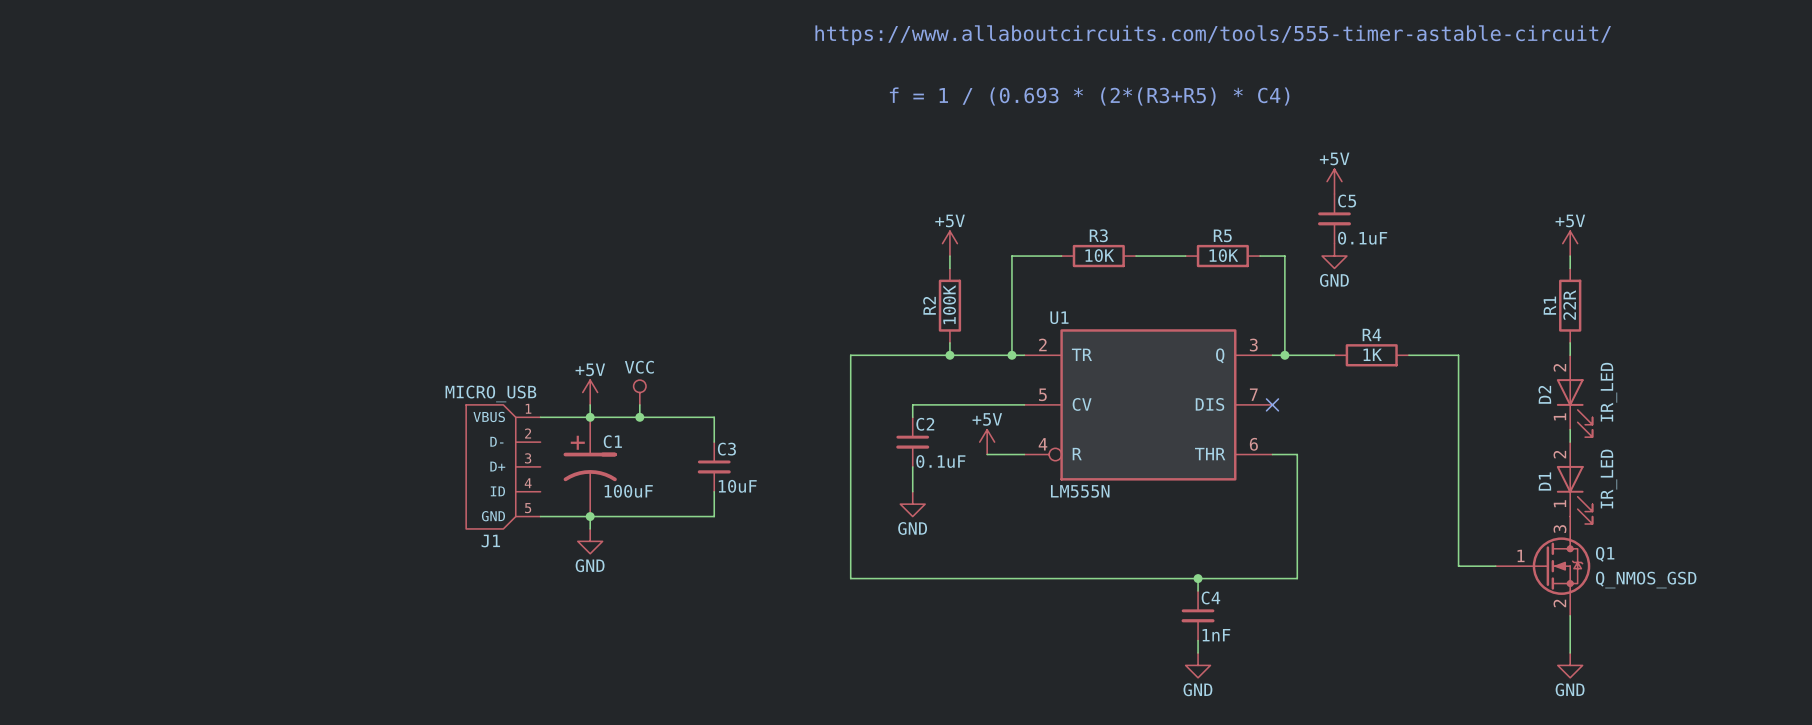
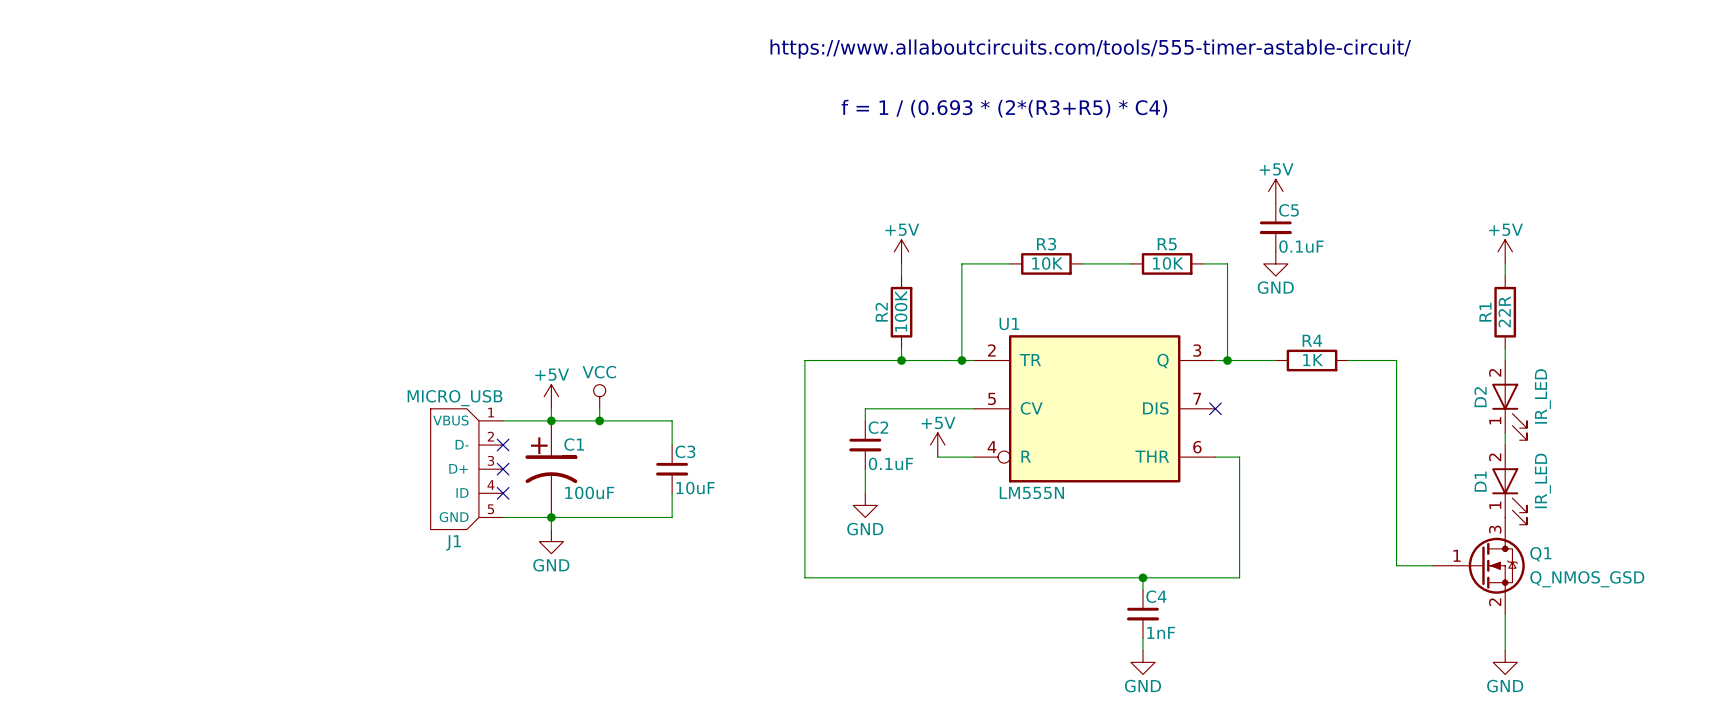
no-connect mark: none -> (503, 445)
no-connect mark: none -> (503, 469)
no-connect mark: none -> (503, 493)

